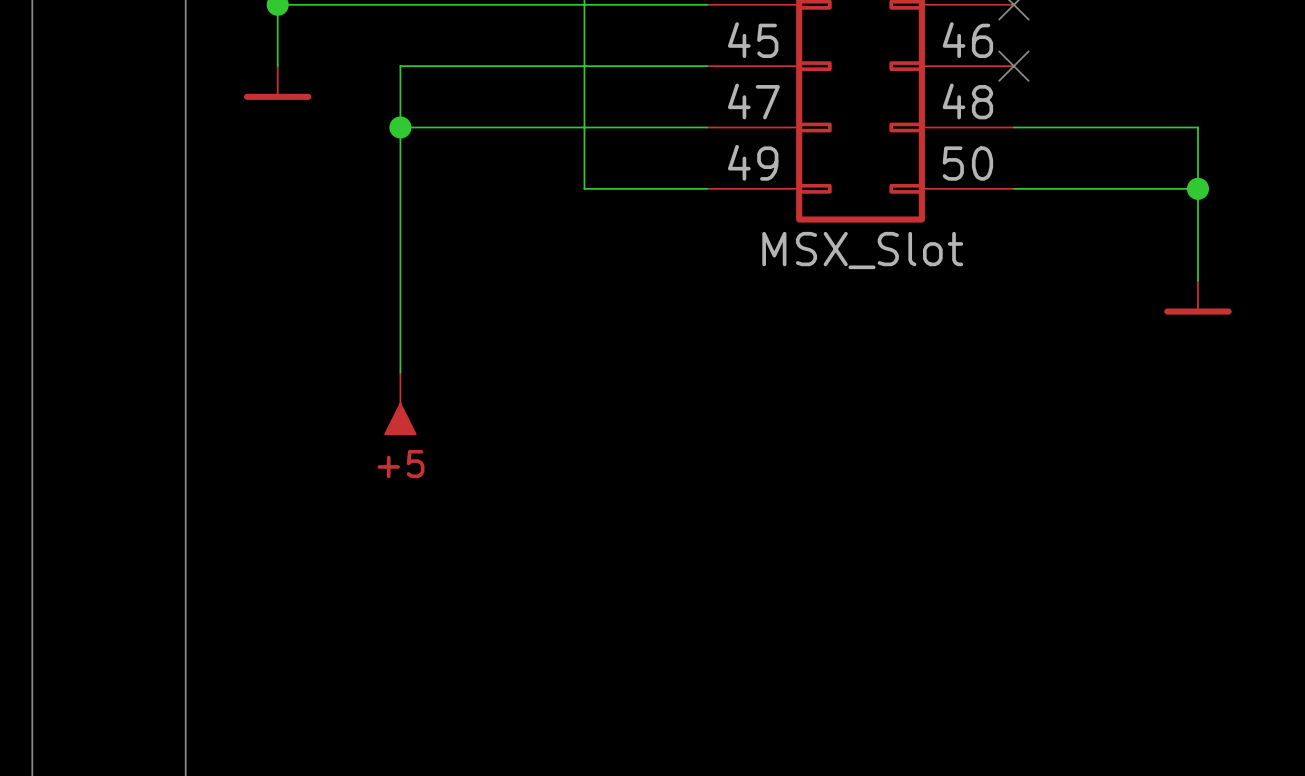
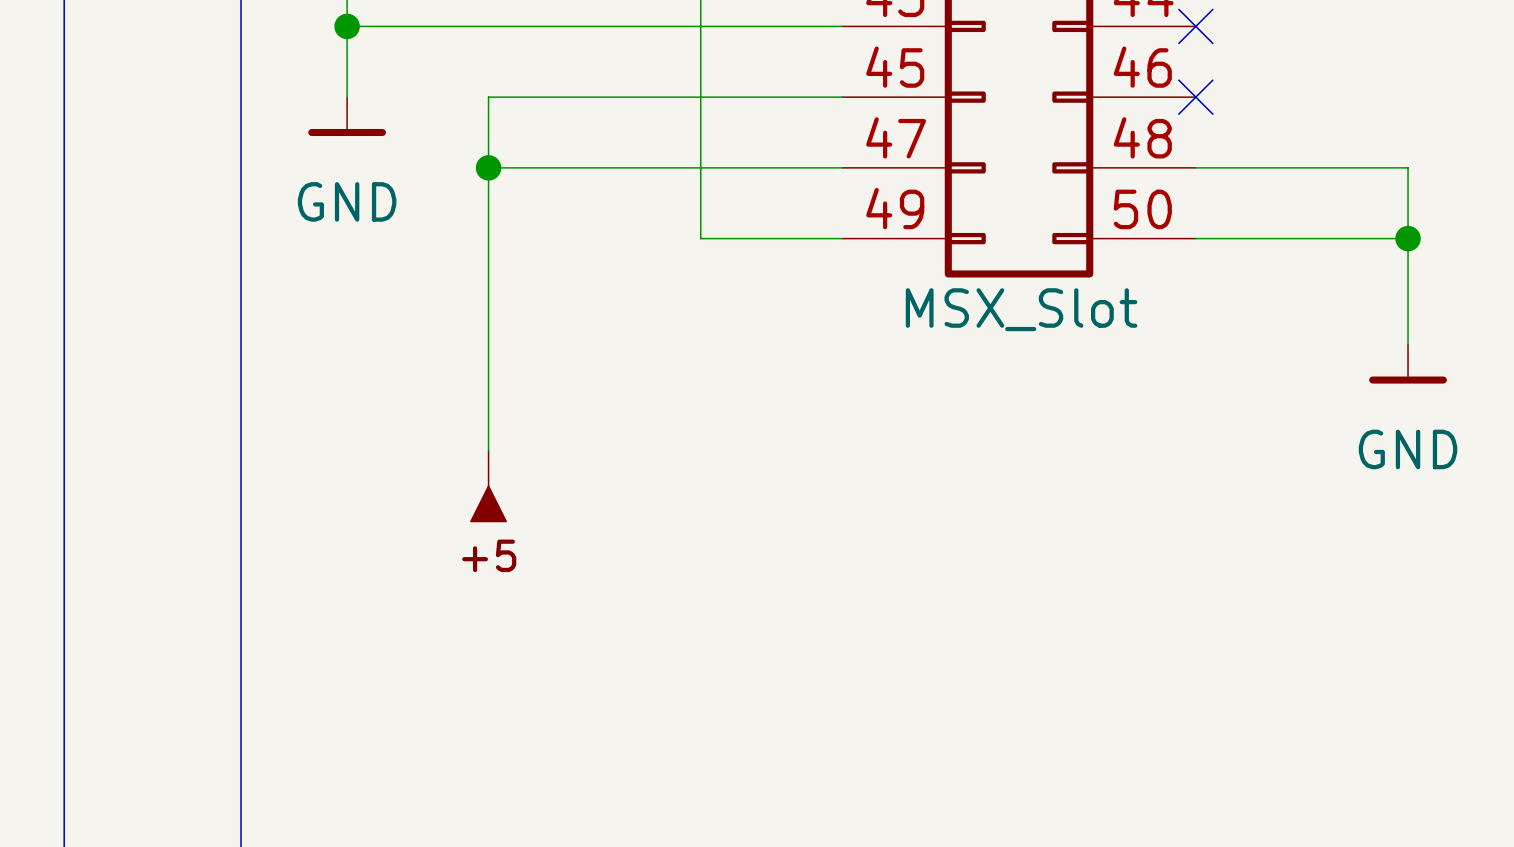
power symbol text: none -> GND (347, 201)
power symbol text: none -> GND (1408, 449)

